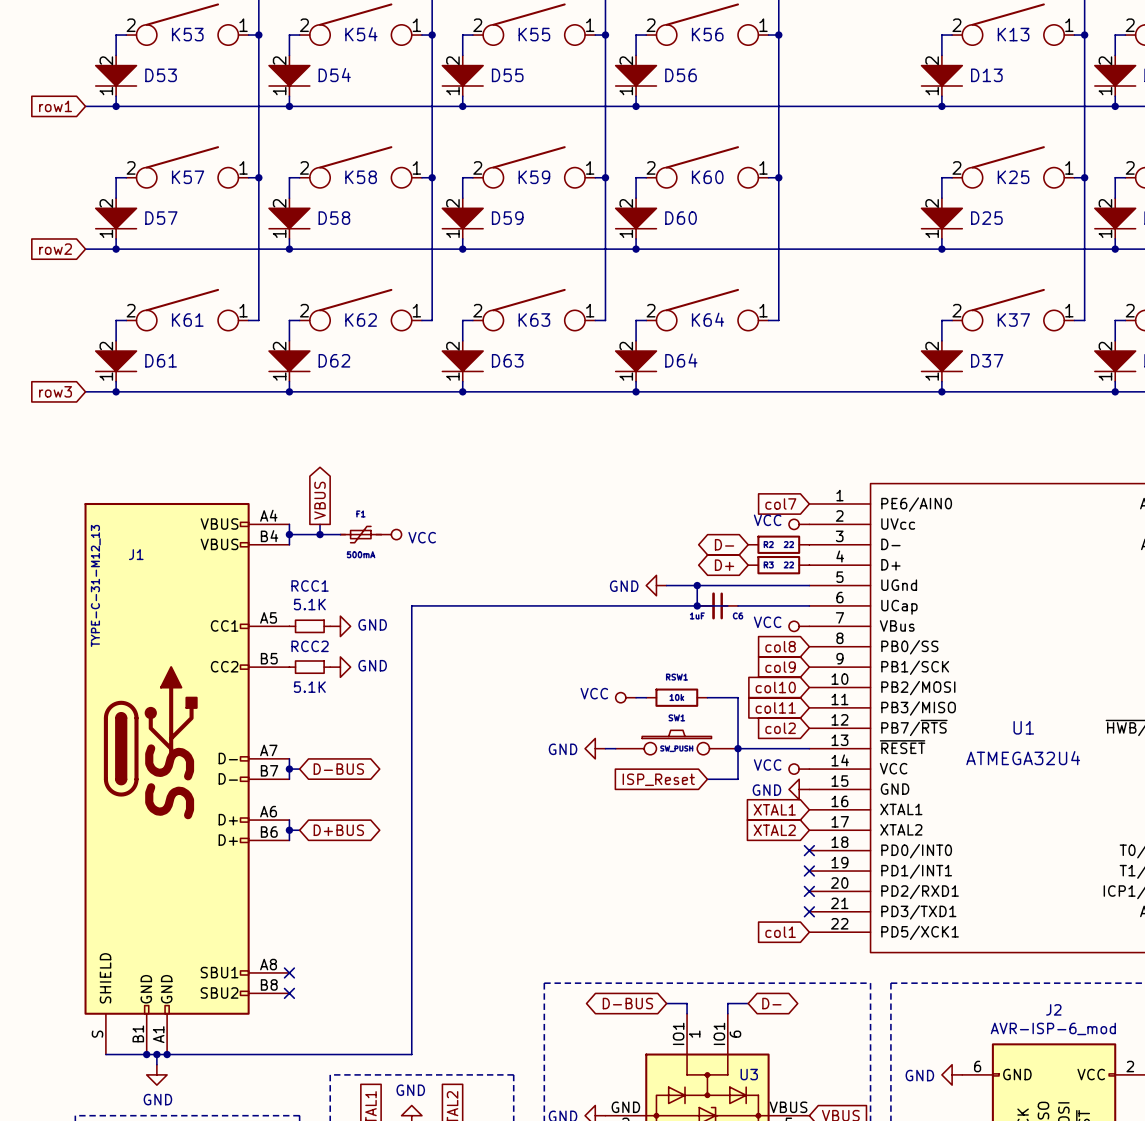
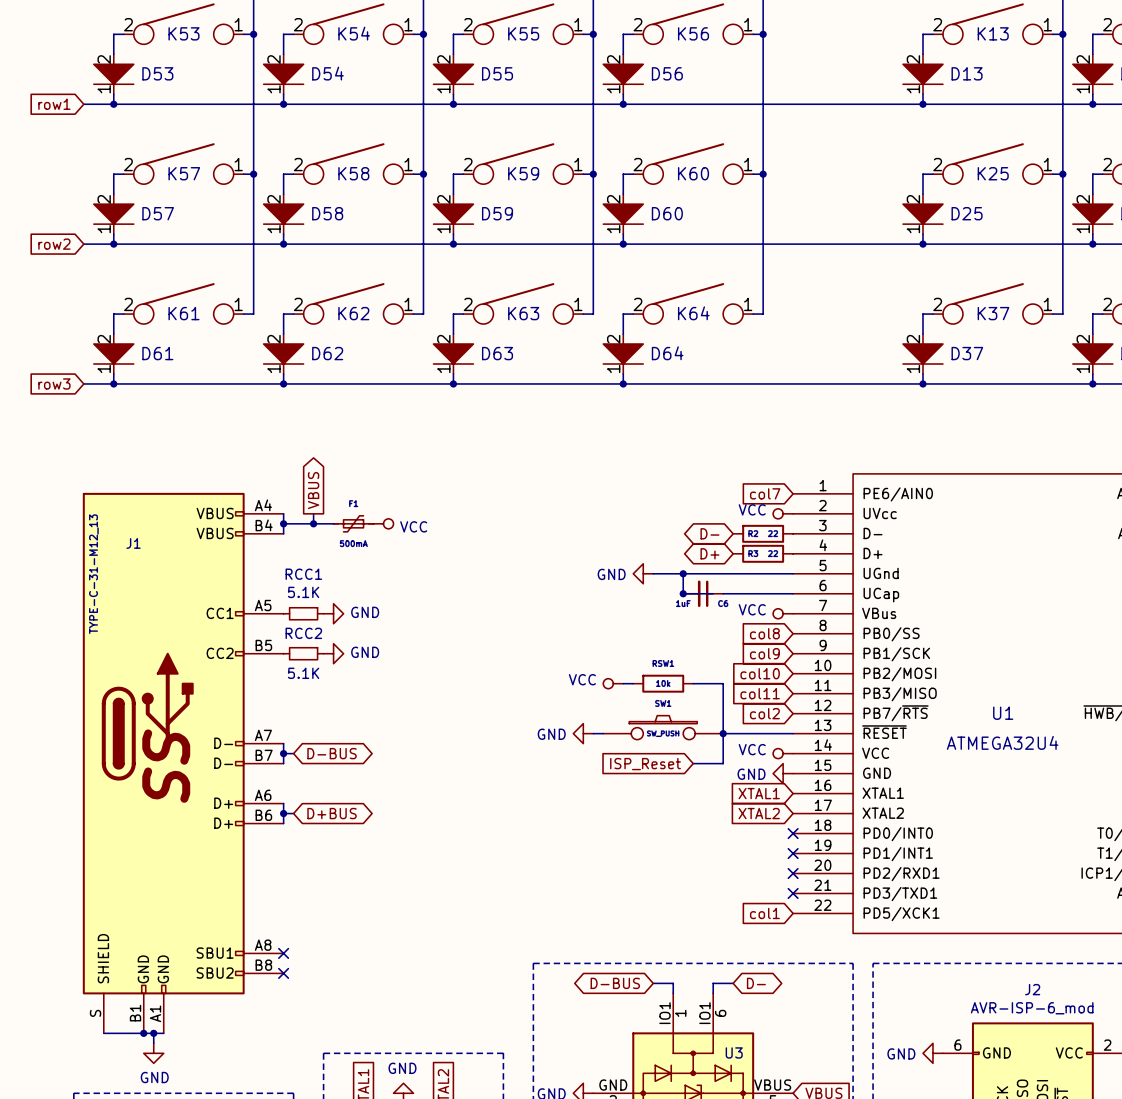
wire: (697, 605) (411, 605) (411, 1054) (167, 1054) -> none
junction: (167, 1054) -> none

